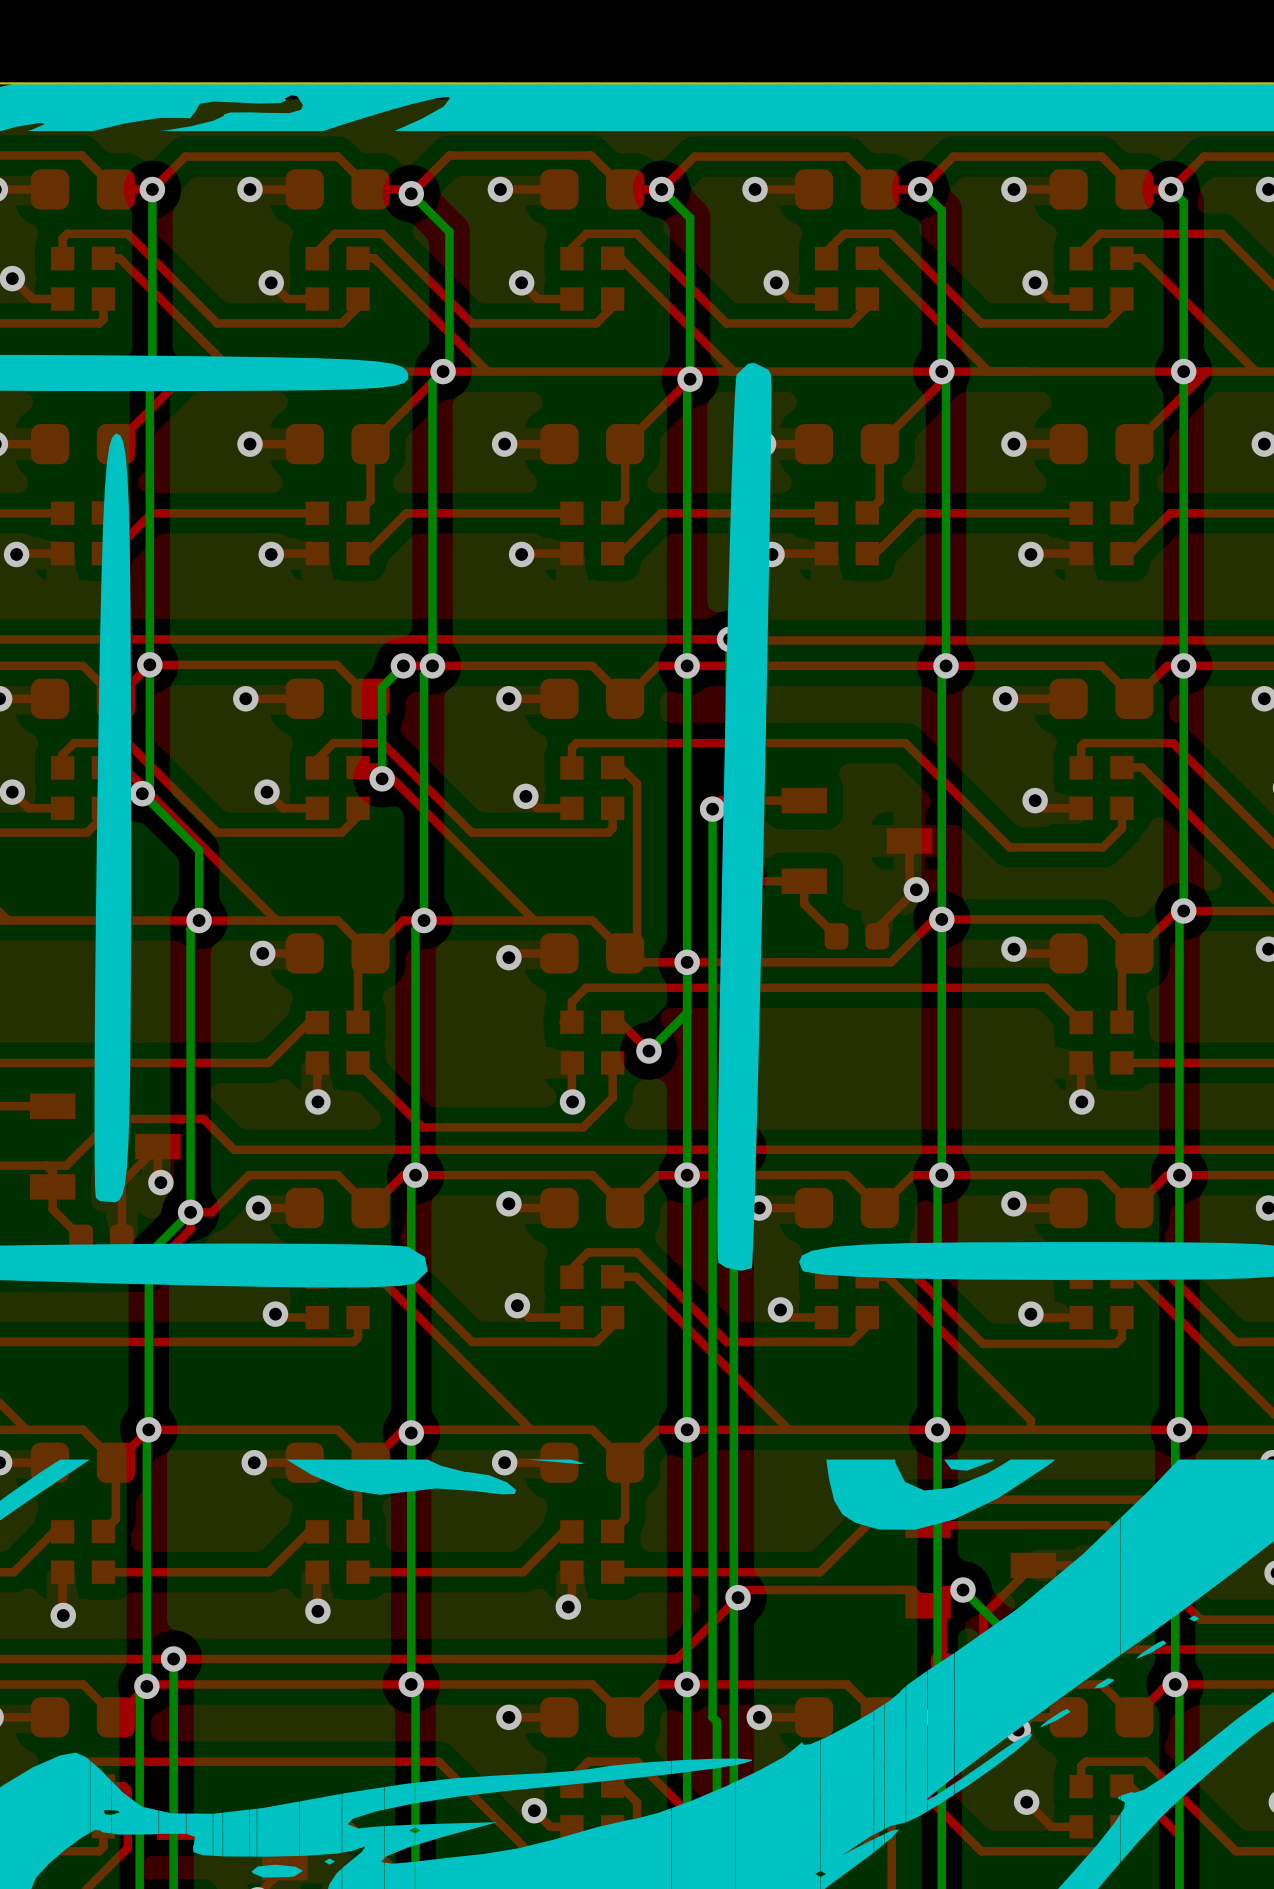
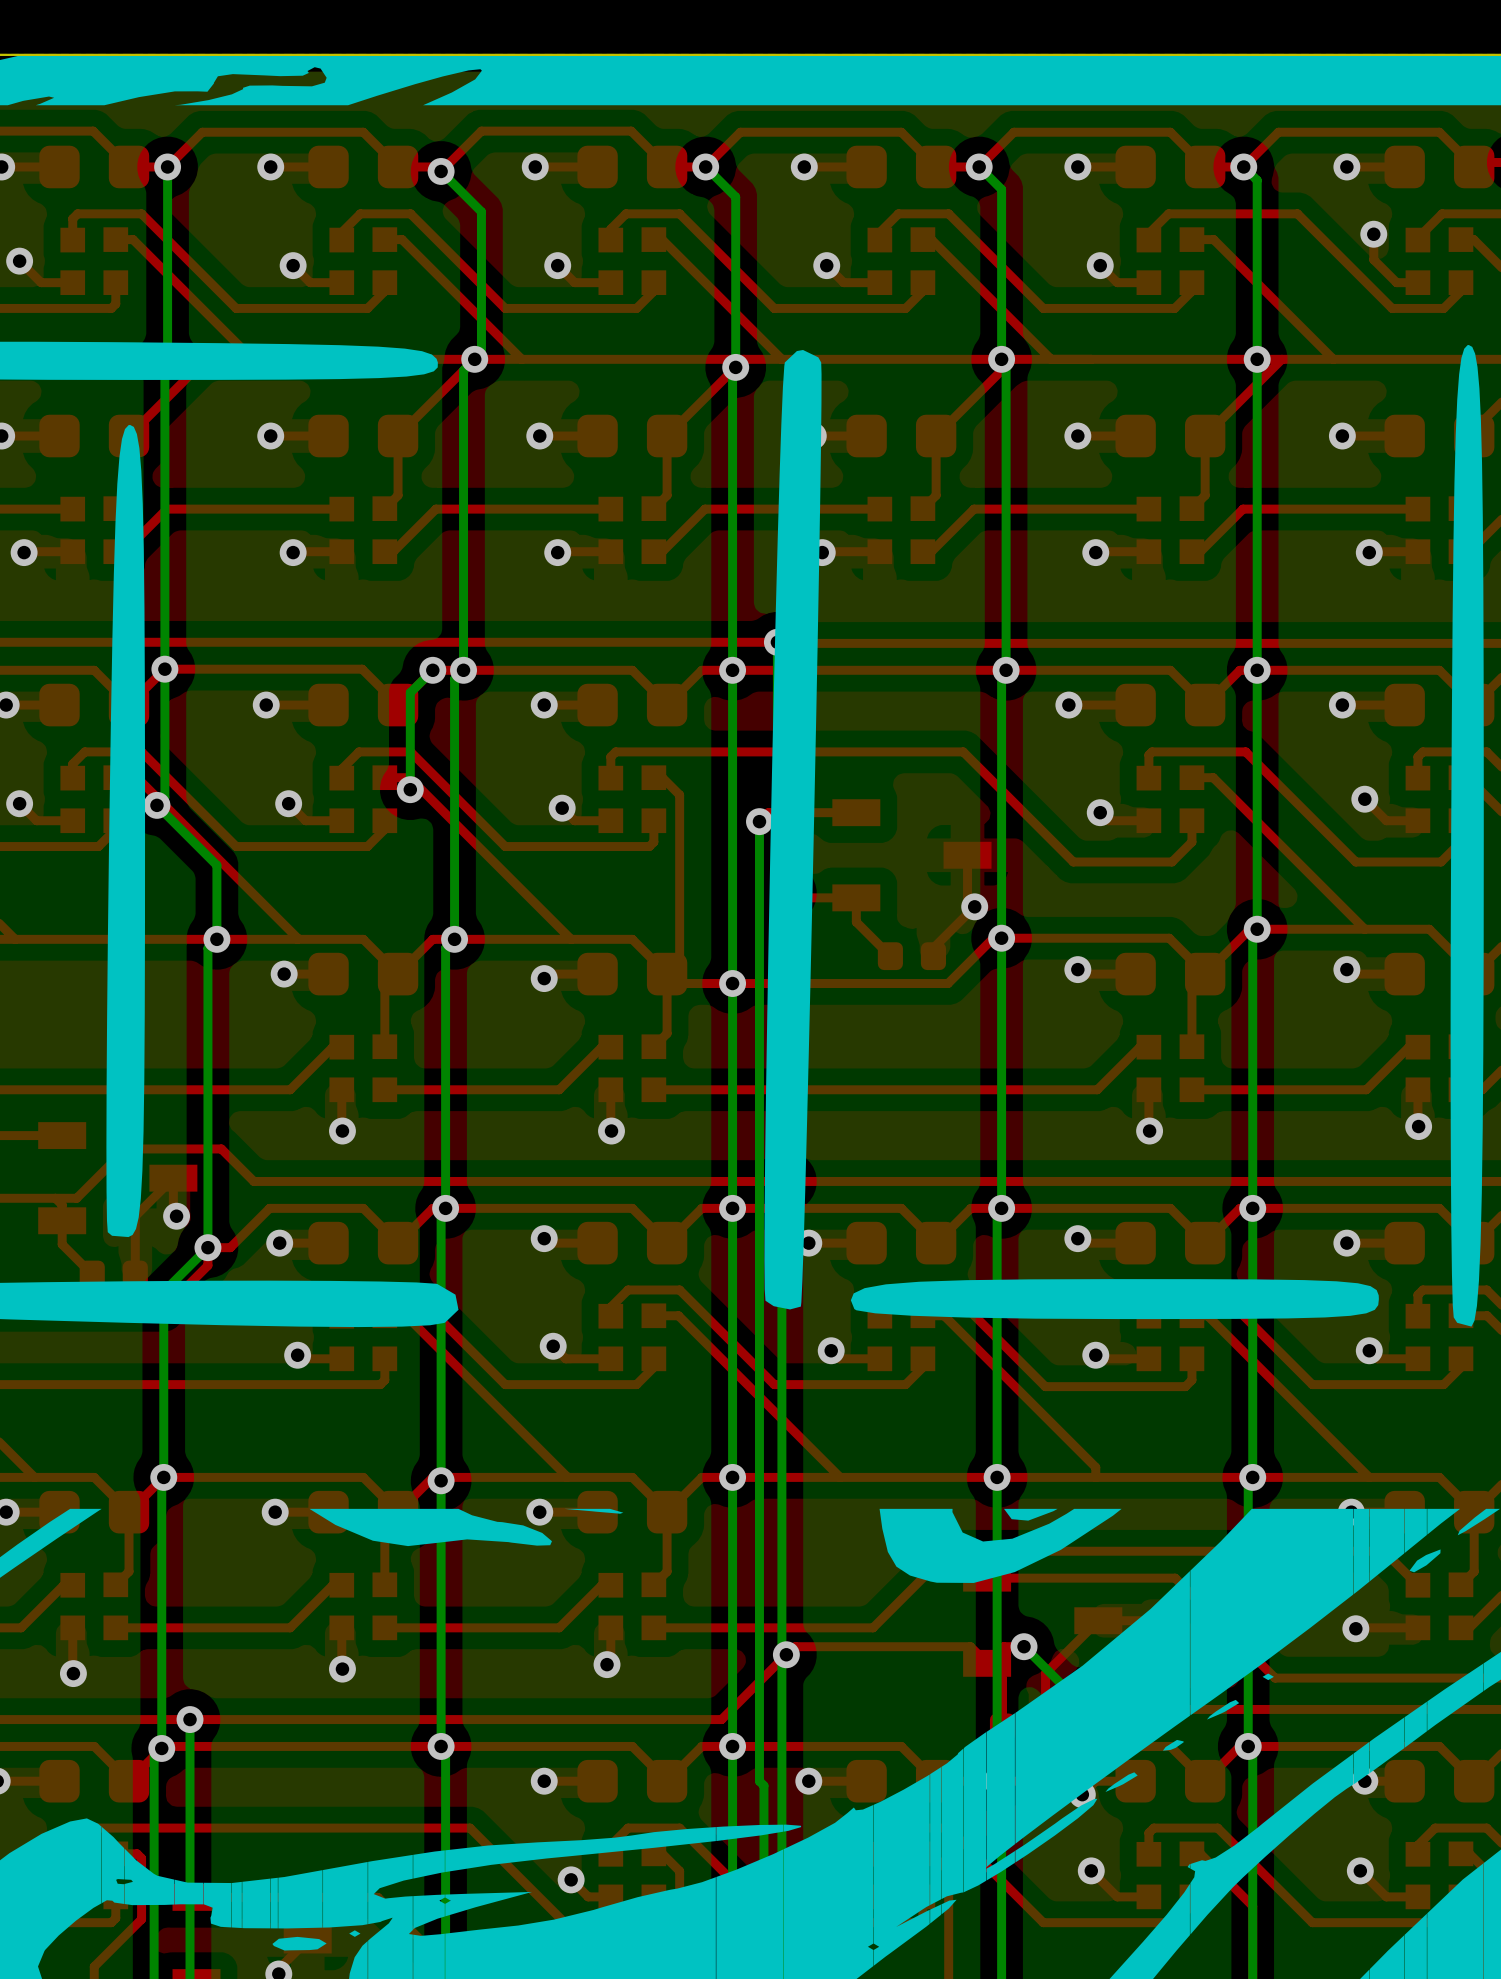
bottom track: (687, 1012) (648, 1051) -> none
top track: (571, 1022) (571, 1002) (586, 987) (1046, 987) (1081, 1022) -> (653, 1089) (1097, 1089) (1139, 1047) (1148, 1047)
top track: (612, 1022) (620, 1022) (648, 1051) -> (653, 1046) (667, 1033) (667, 974)
via: (648, 1051) -> none
top track: (612, 1062) (612, 1097) (583, 1127) (422, 1127) (358, 1062) -> (601, 1047) (559, 1089) (384, 1089)

